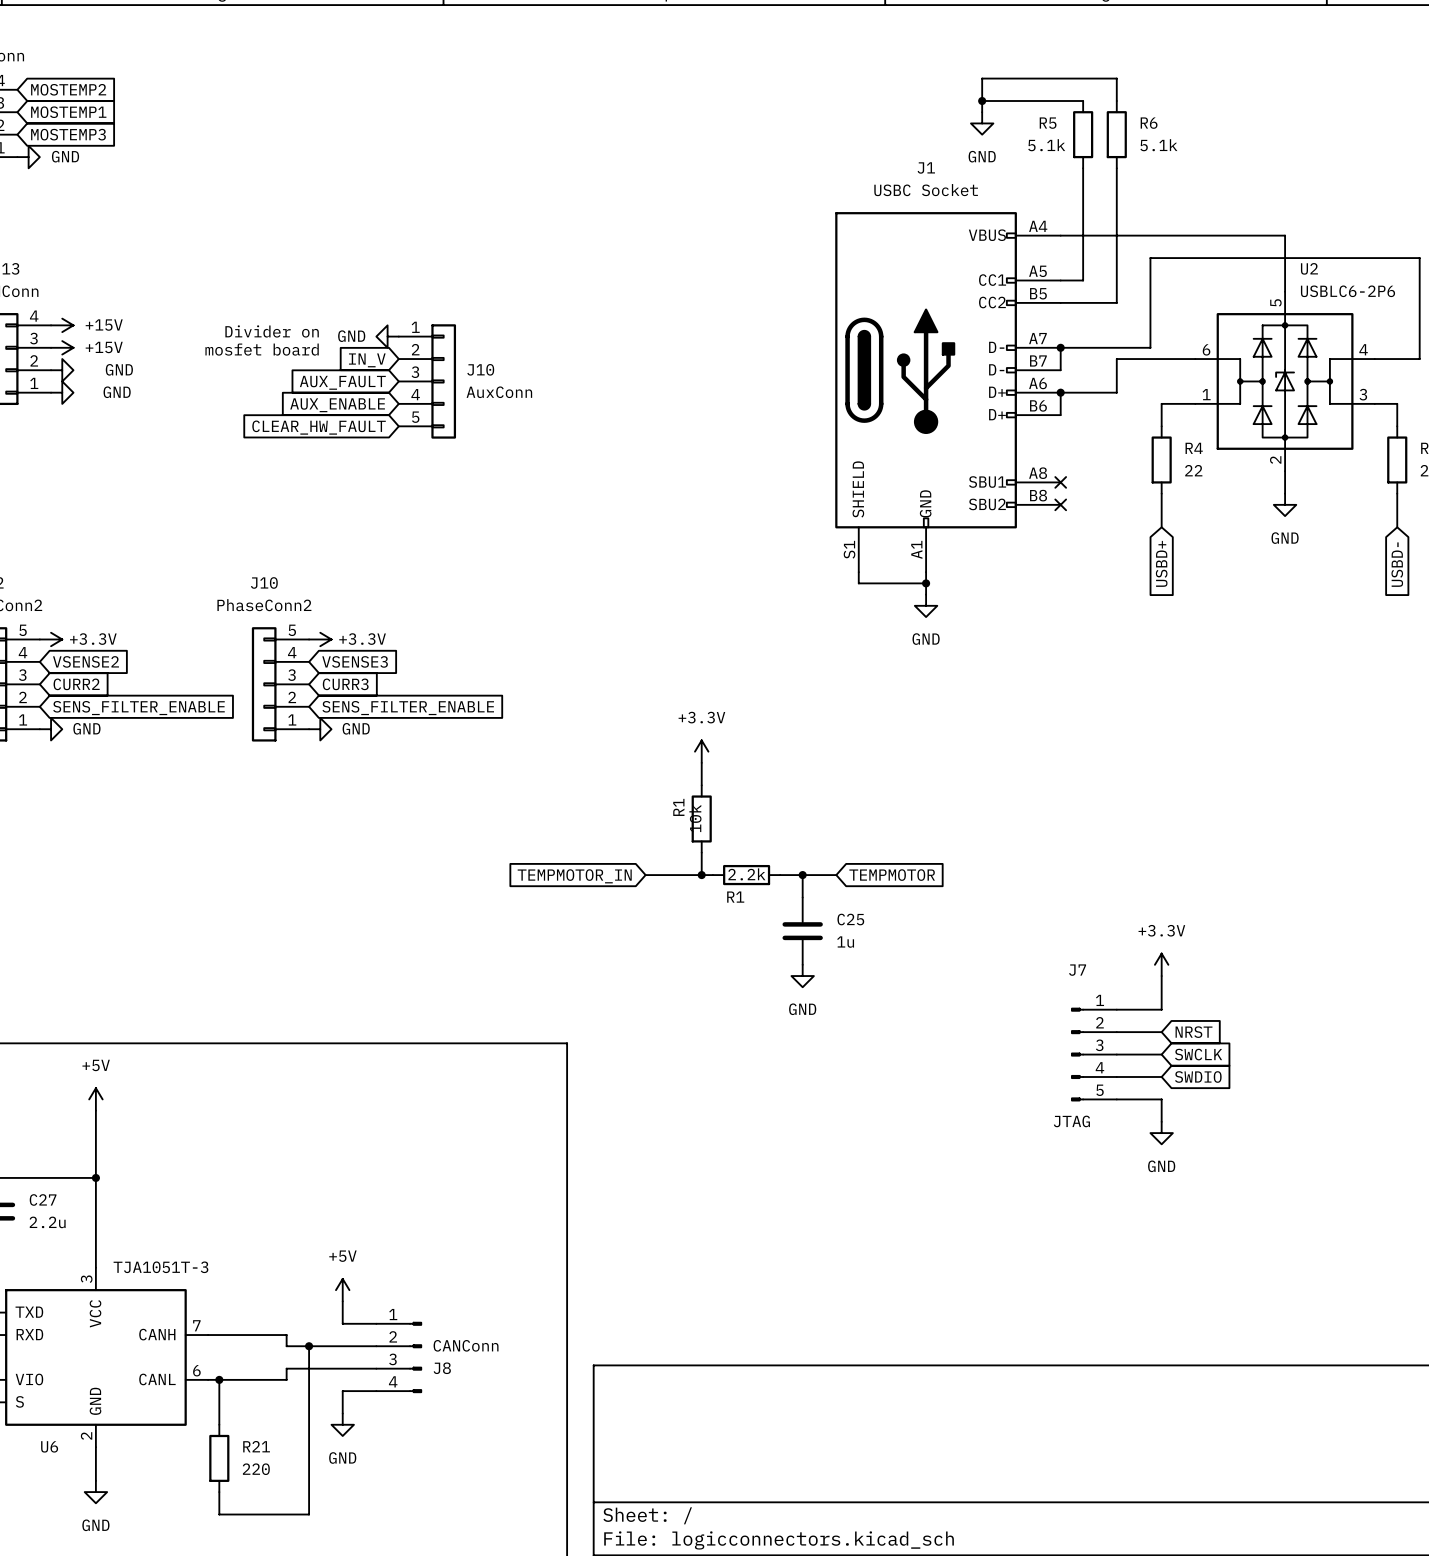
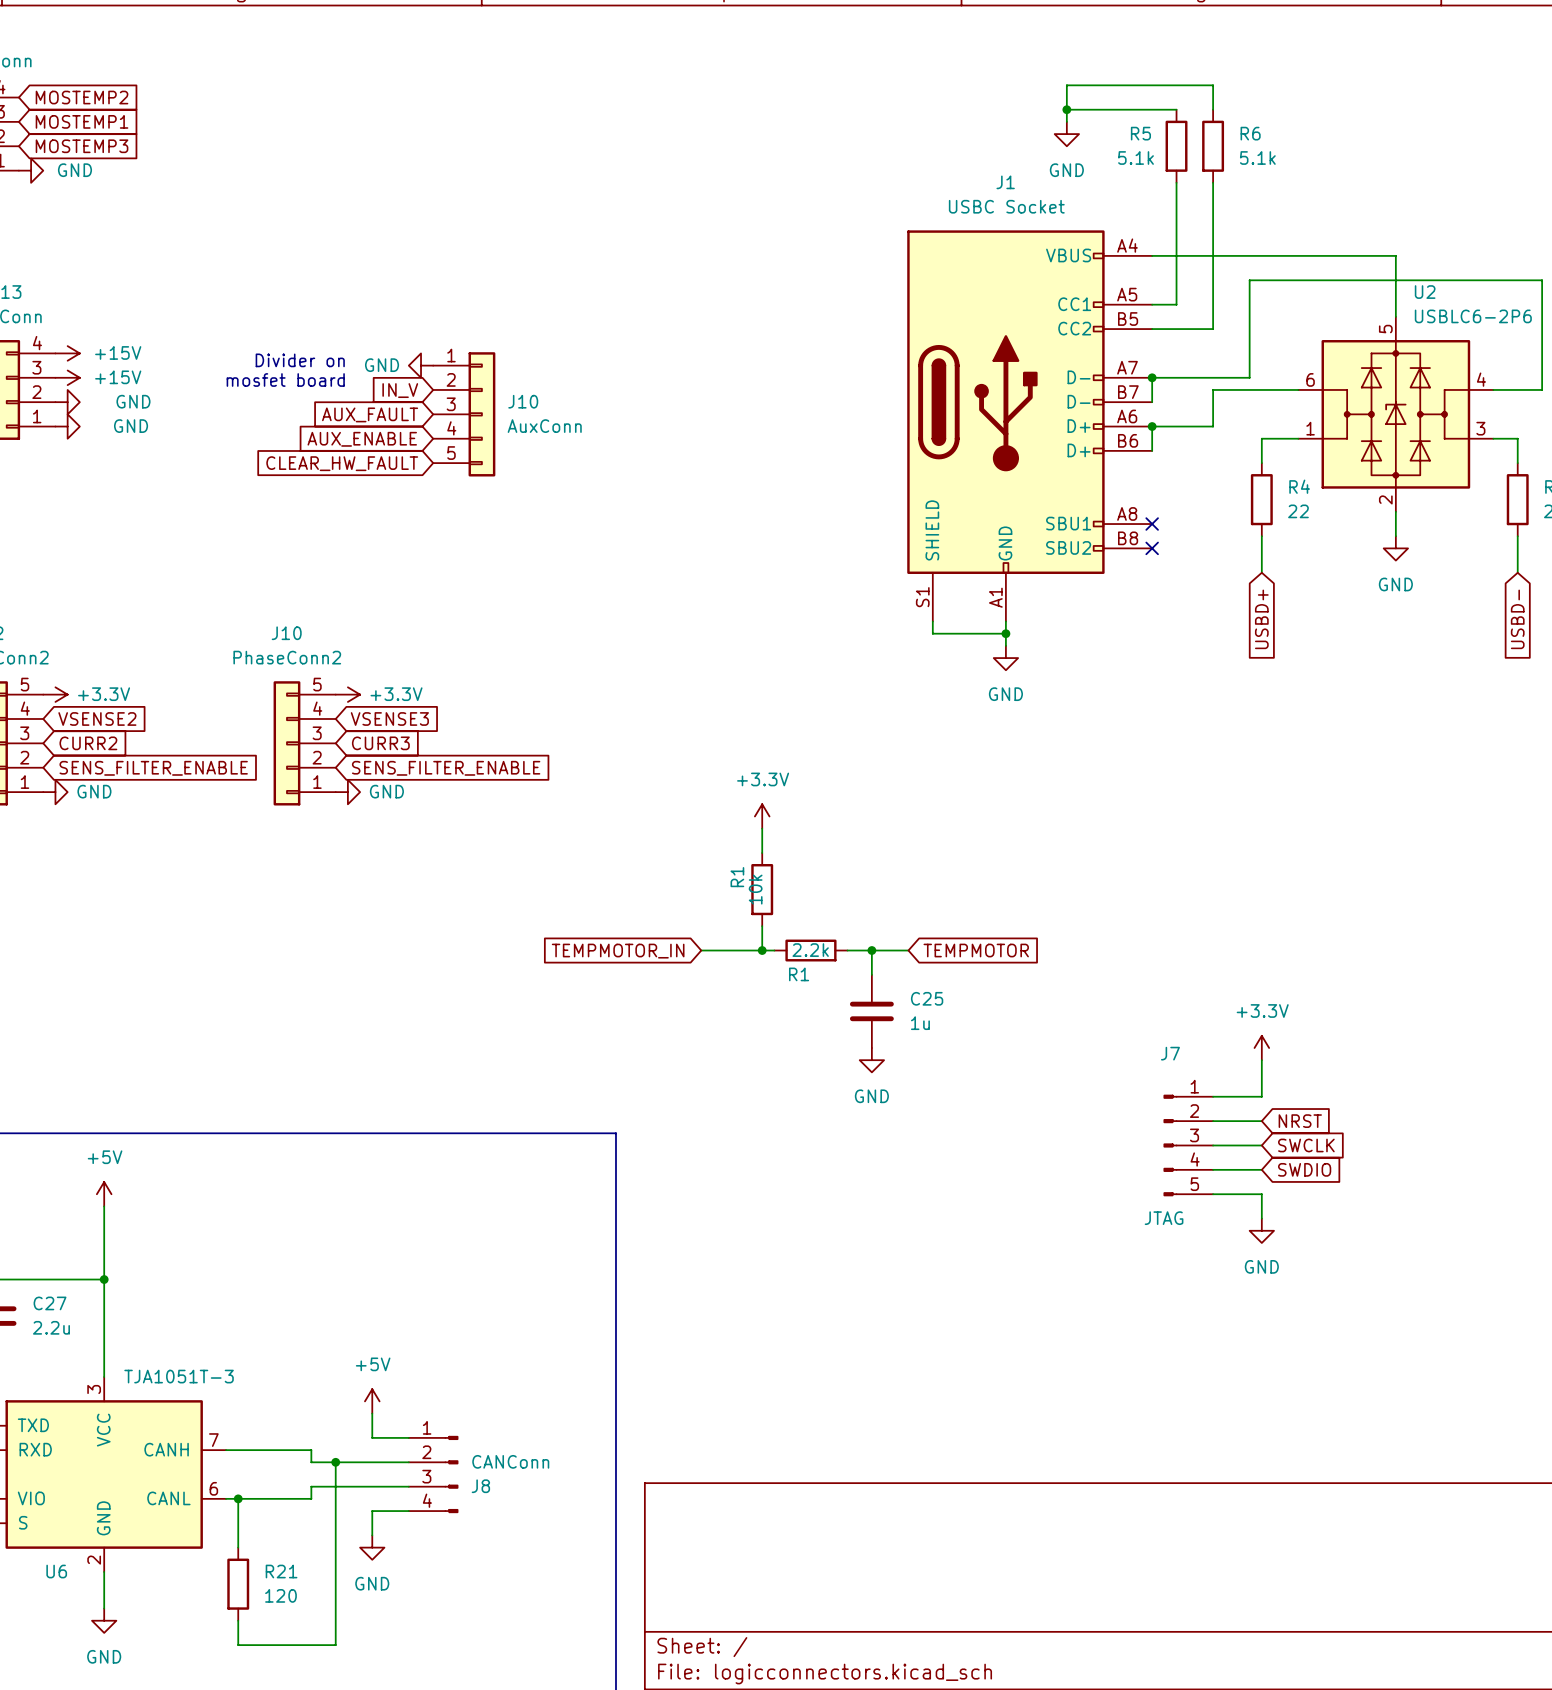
R21 value: 220 (256, 1469) -> 120 (280, 1595)

